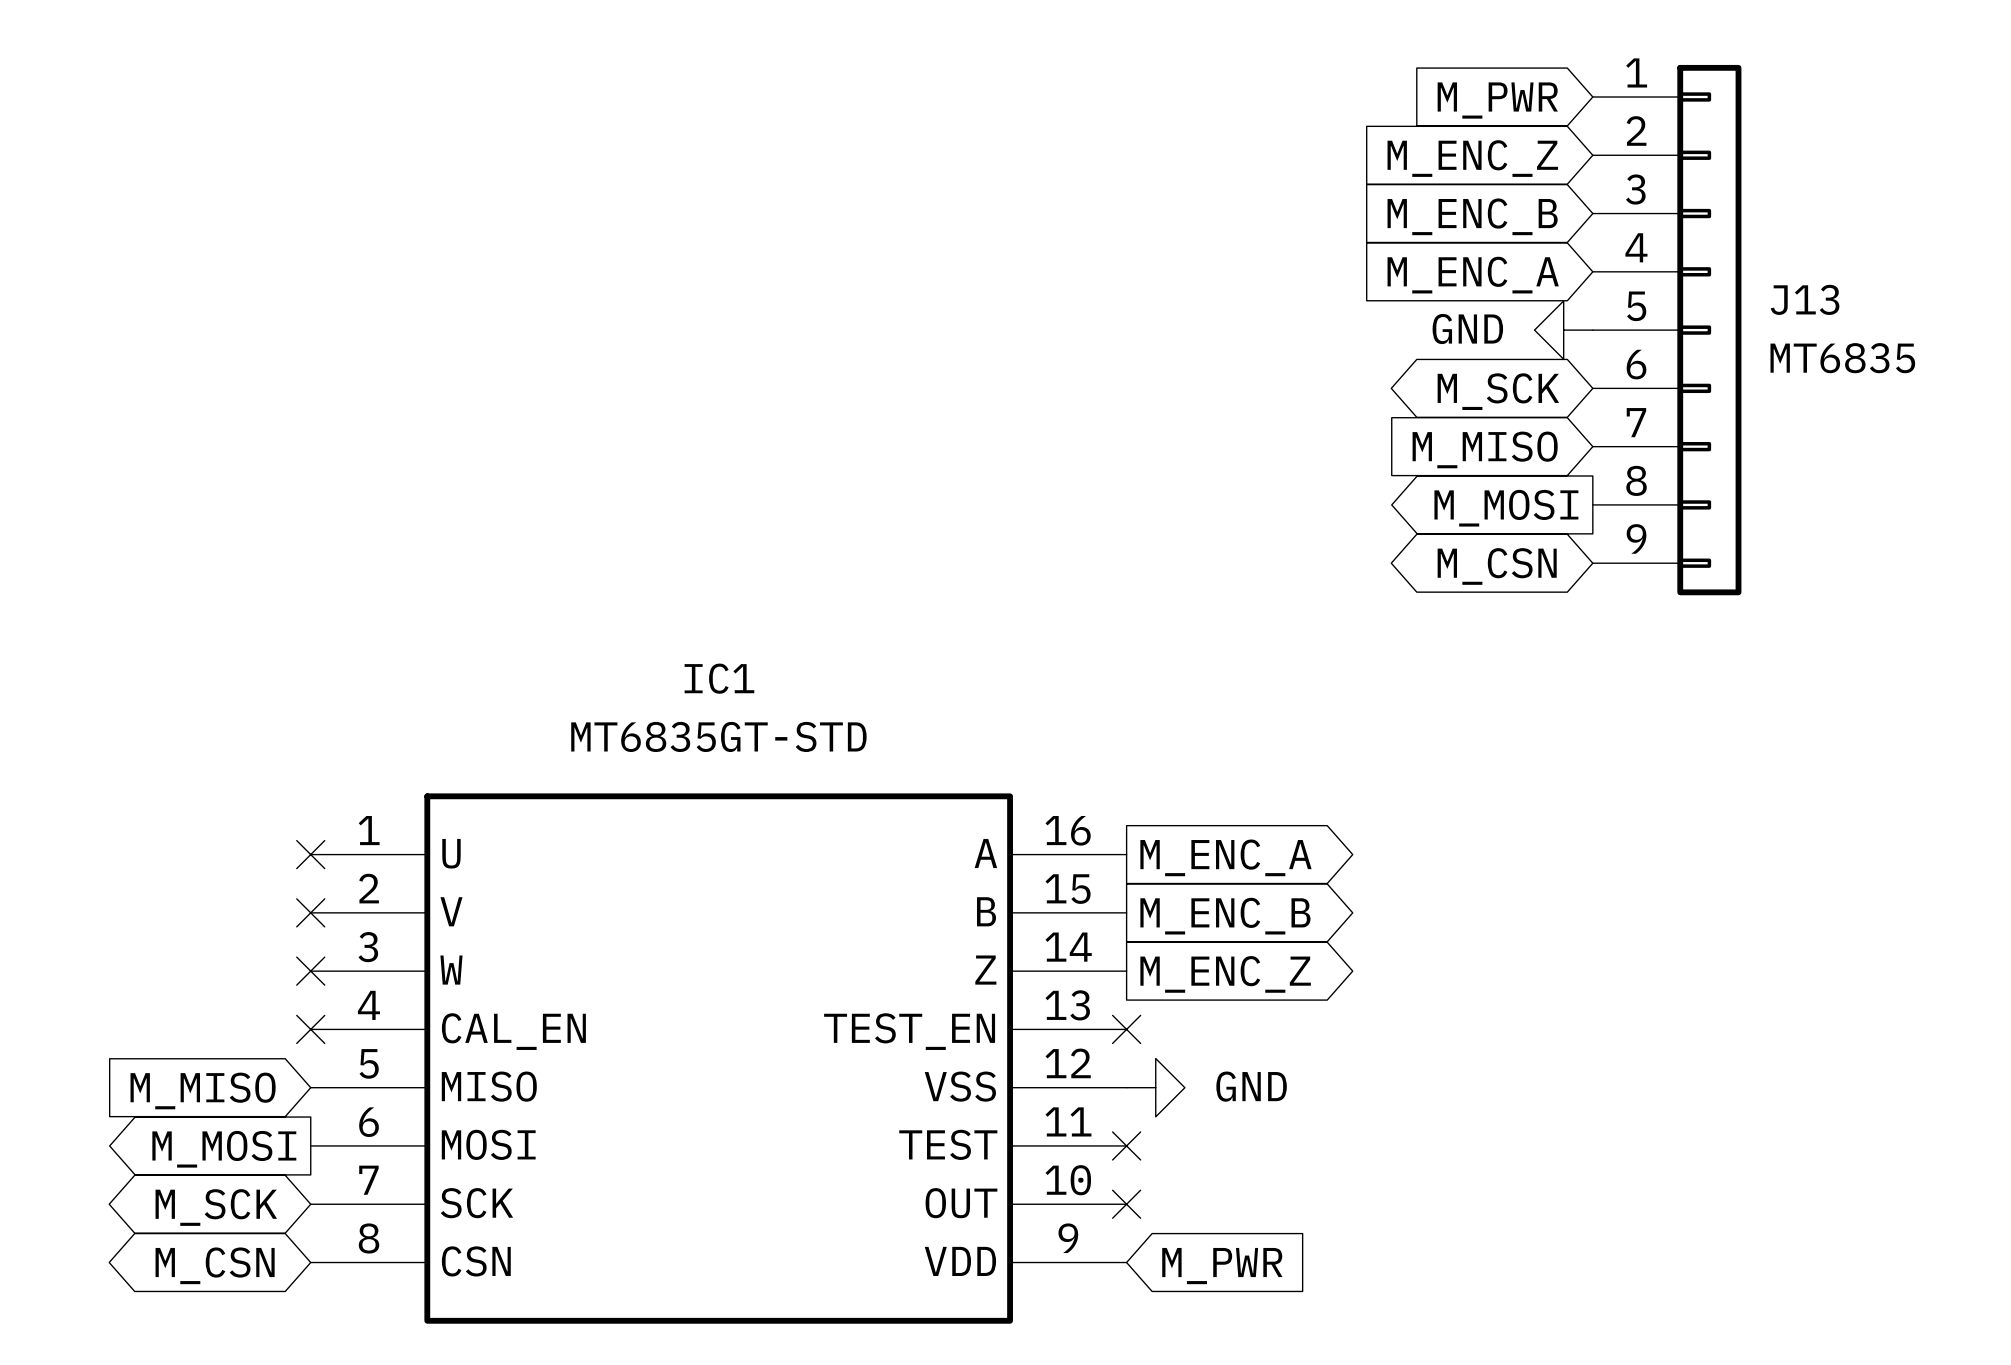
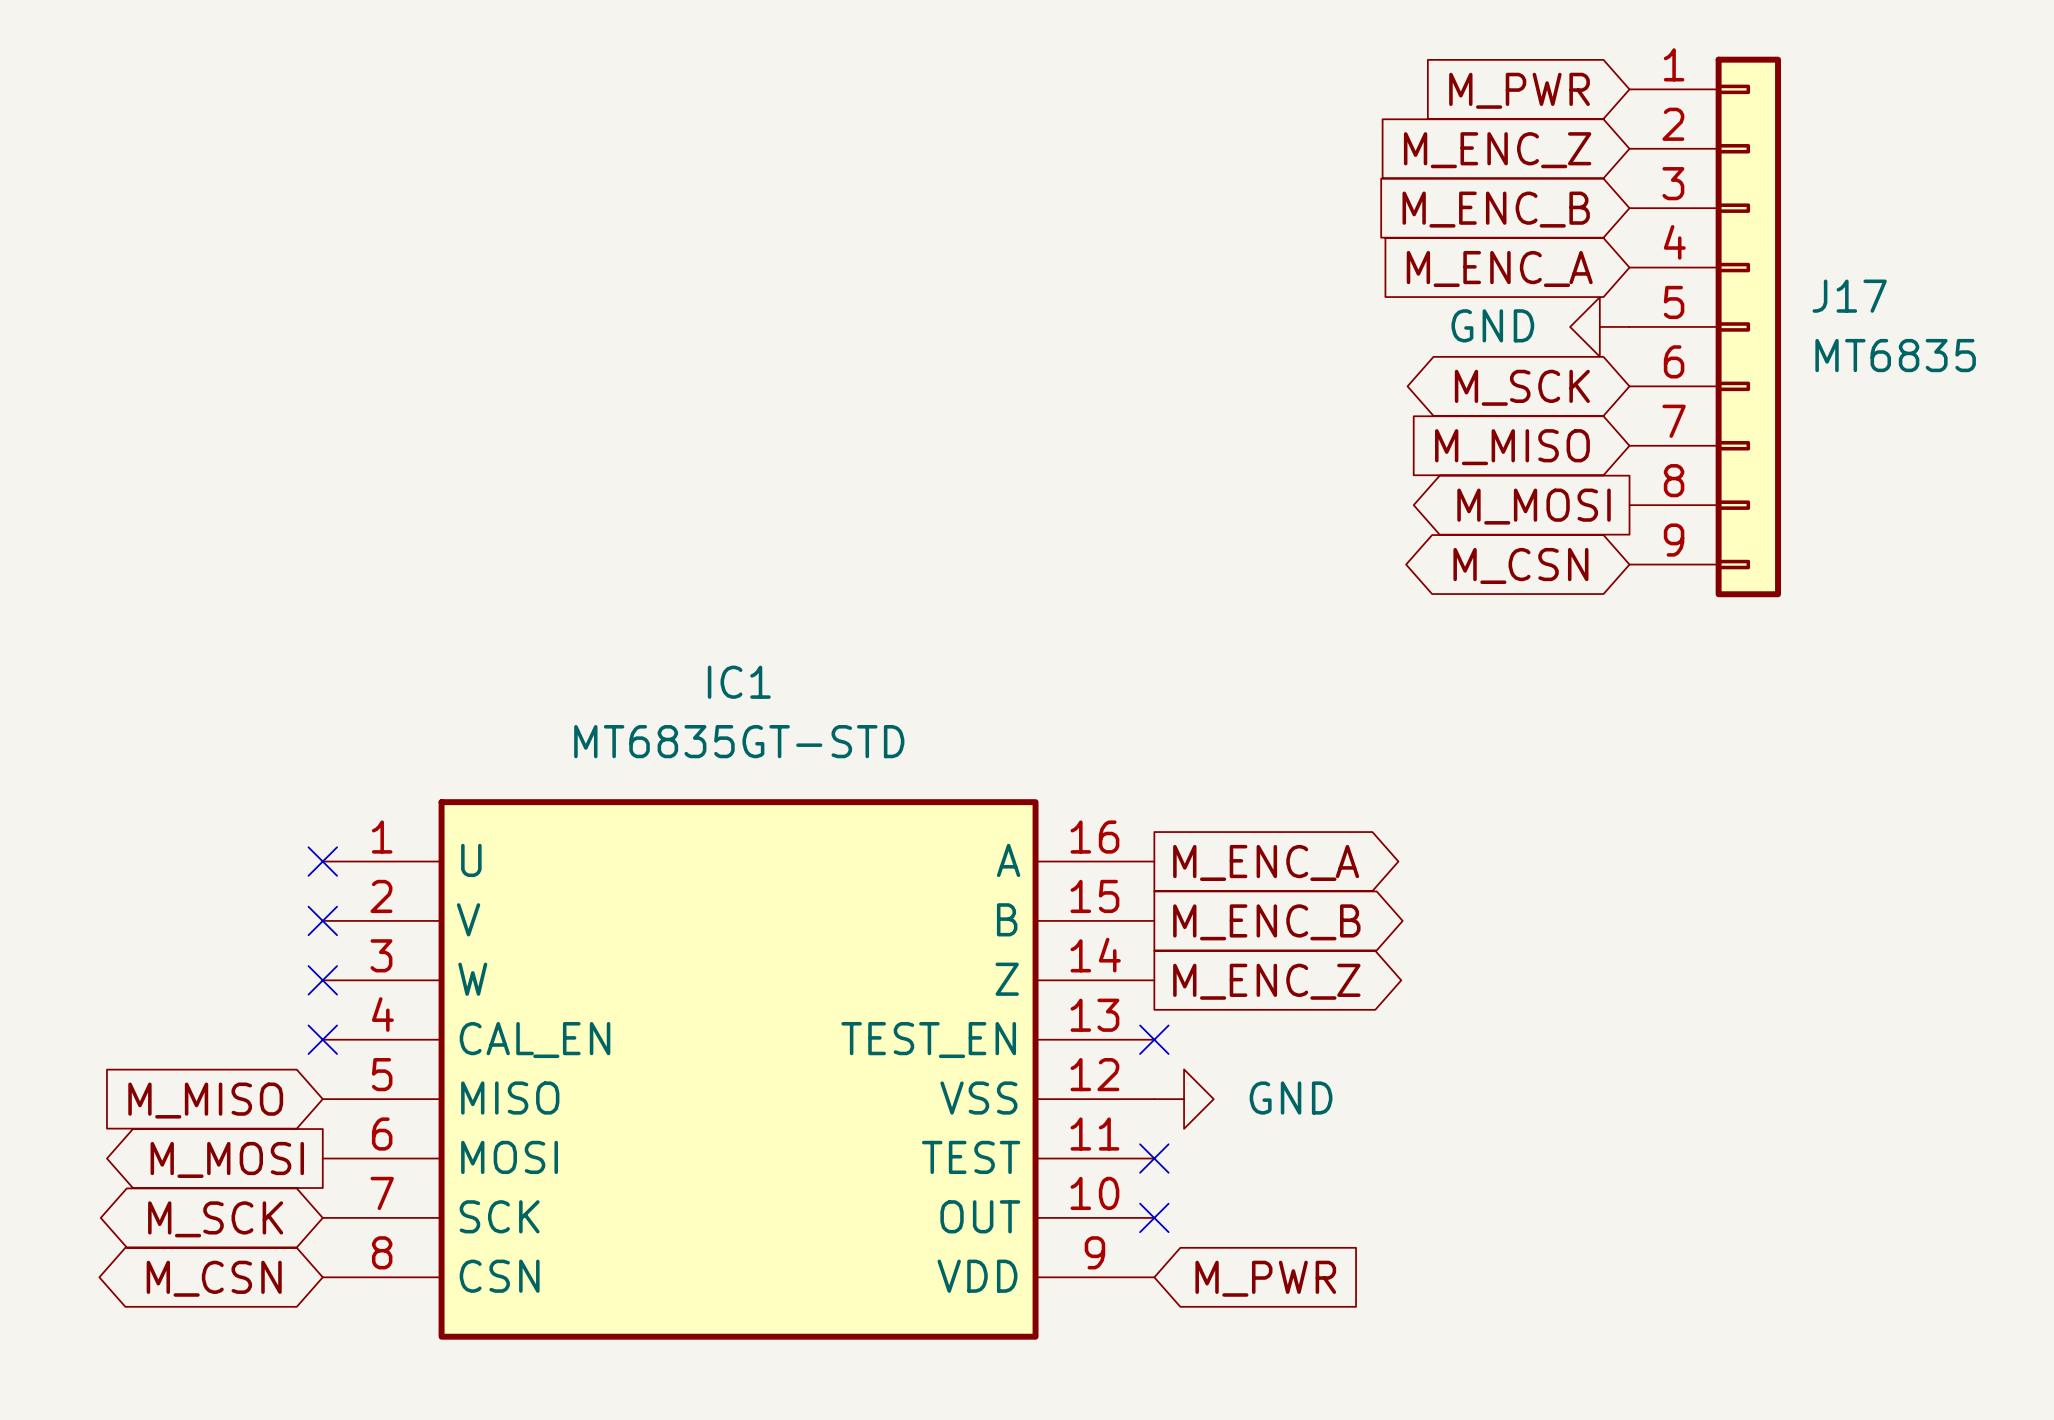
J13 name: J13 (1805, 299) -> J17 (1849, 296)

